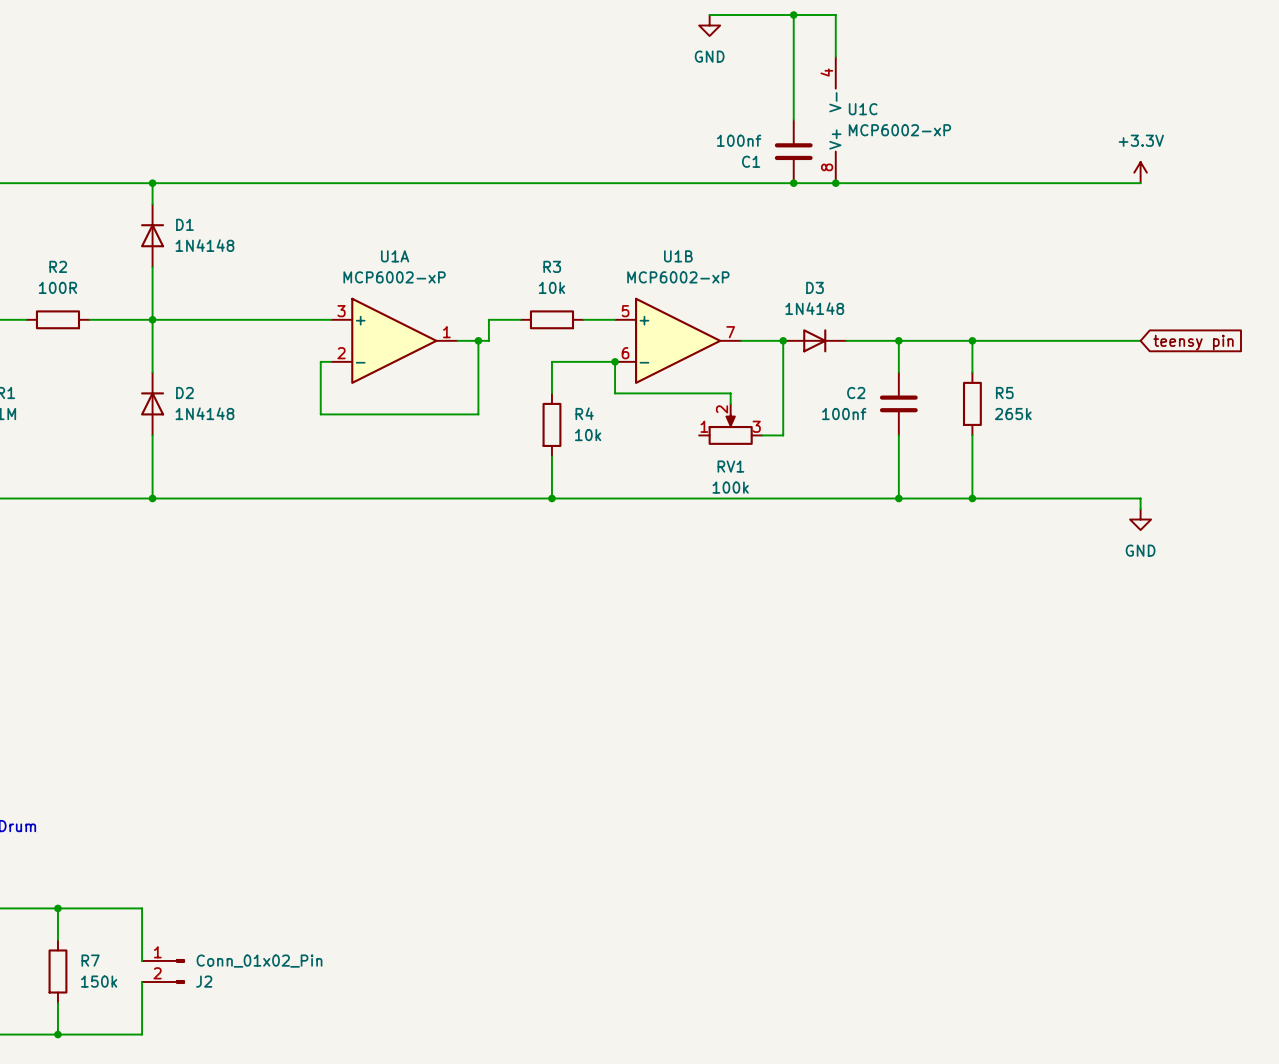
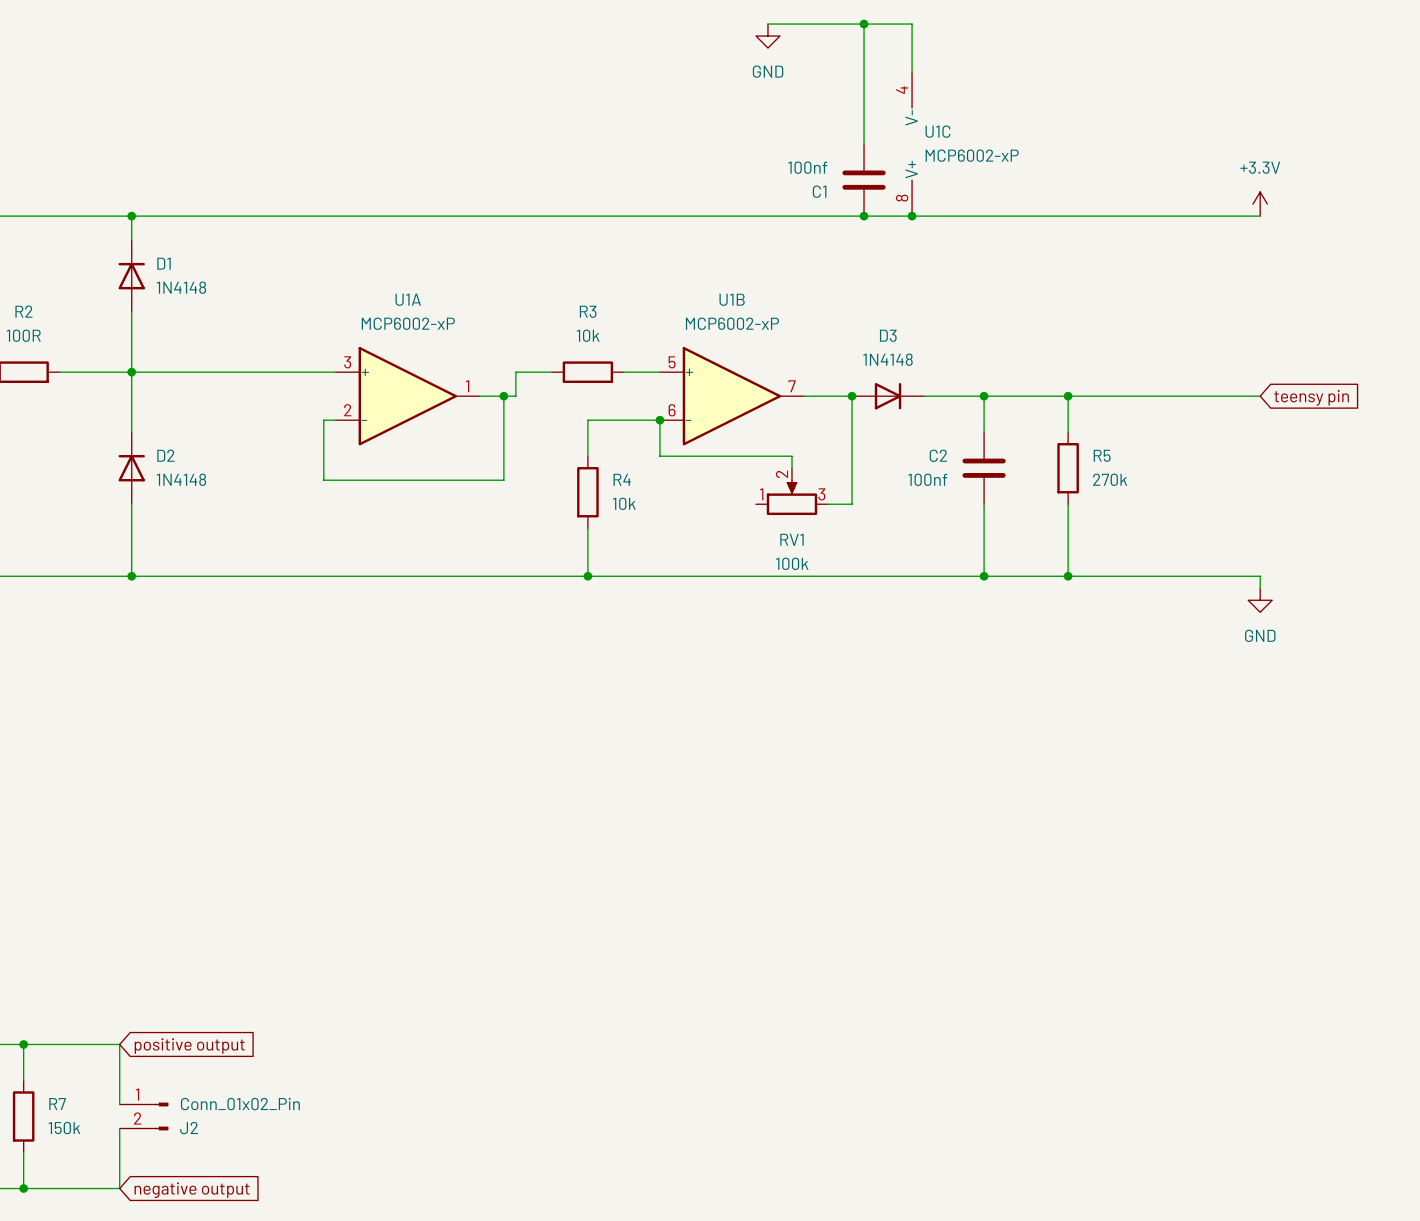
R5 value: 265k (1013, 414) -> 270k (1110, 479)
global label: none -> positive output (189, 1046)
global label: none -> negative output (192, 1190)

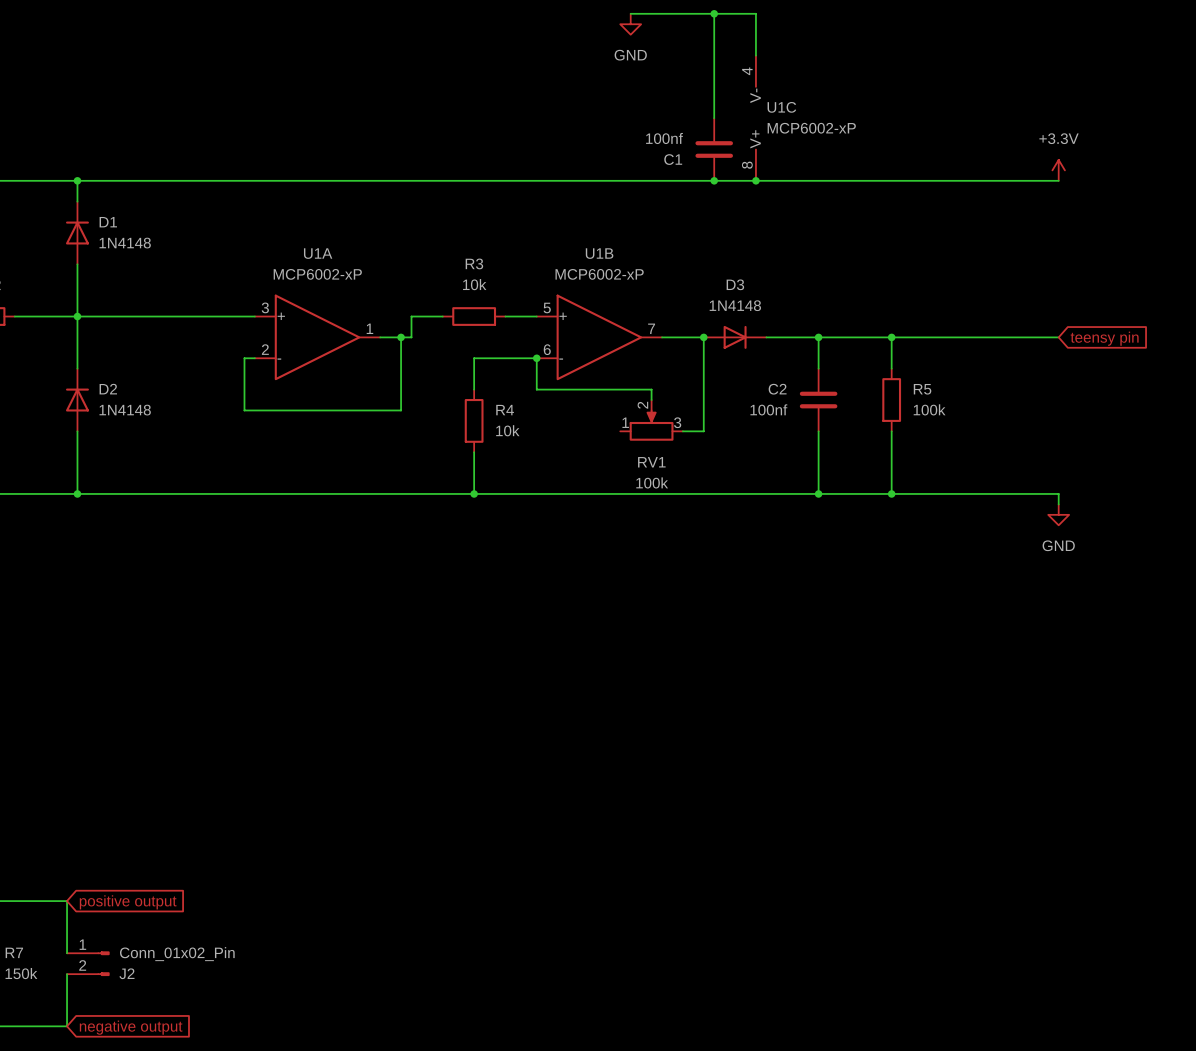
R5 value: 270k (1110, 479) -> 100k (929, 409)

